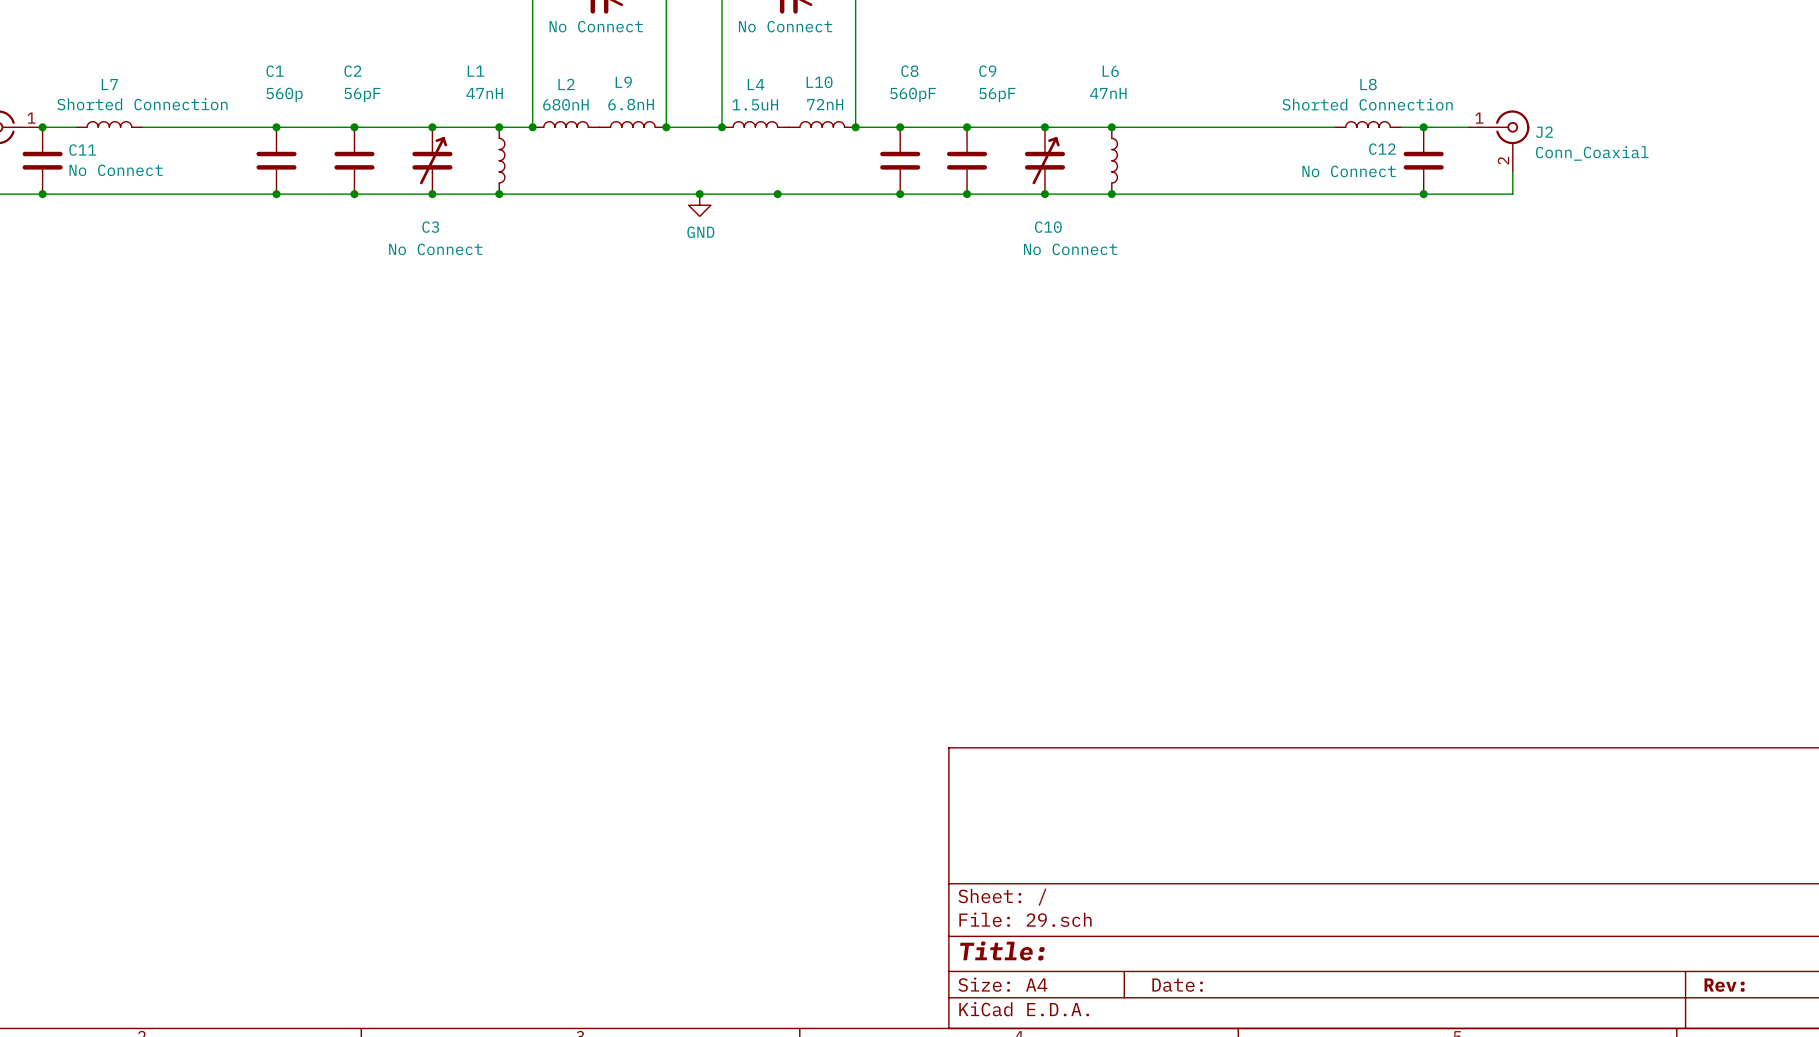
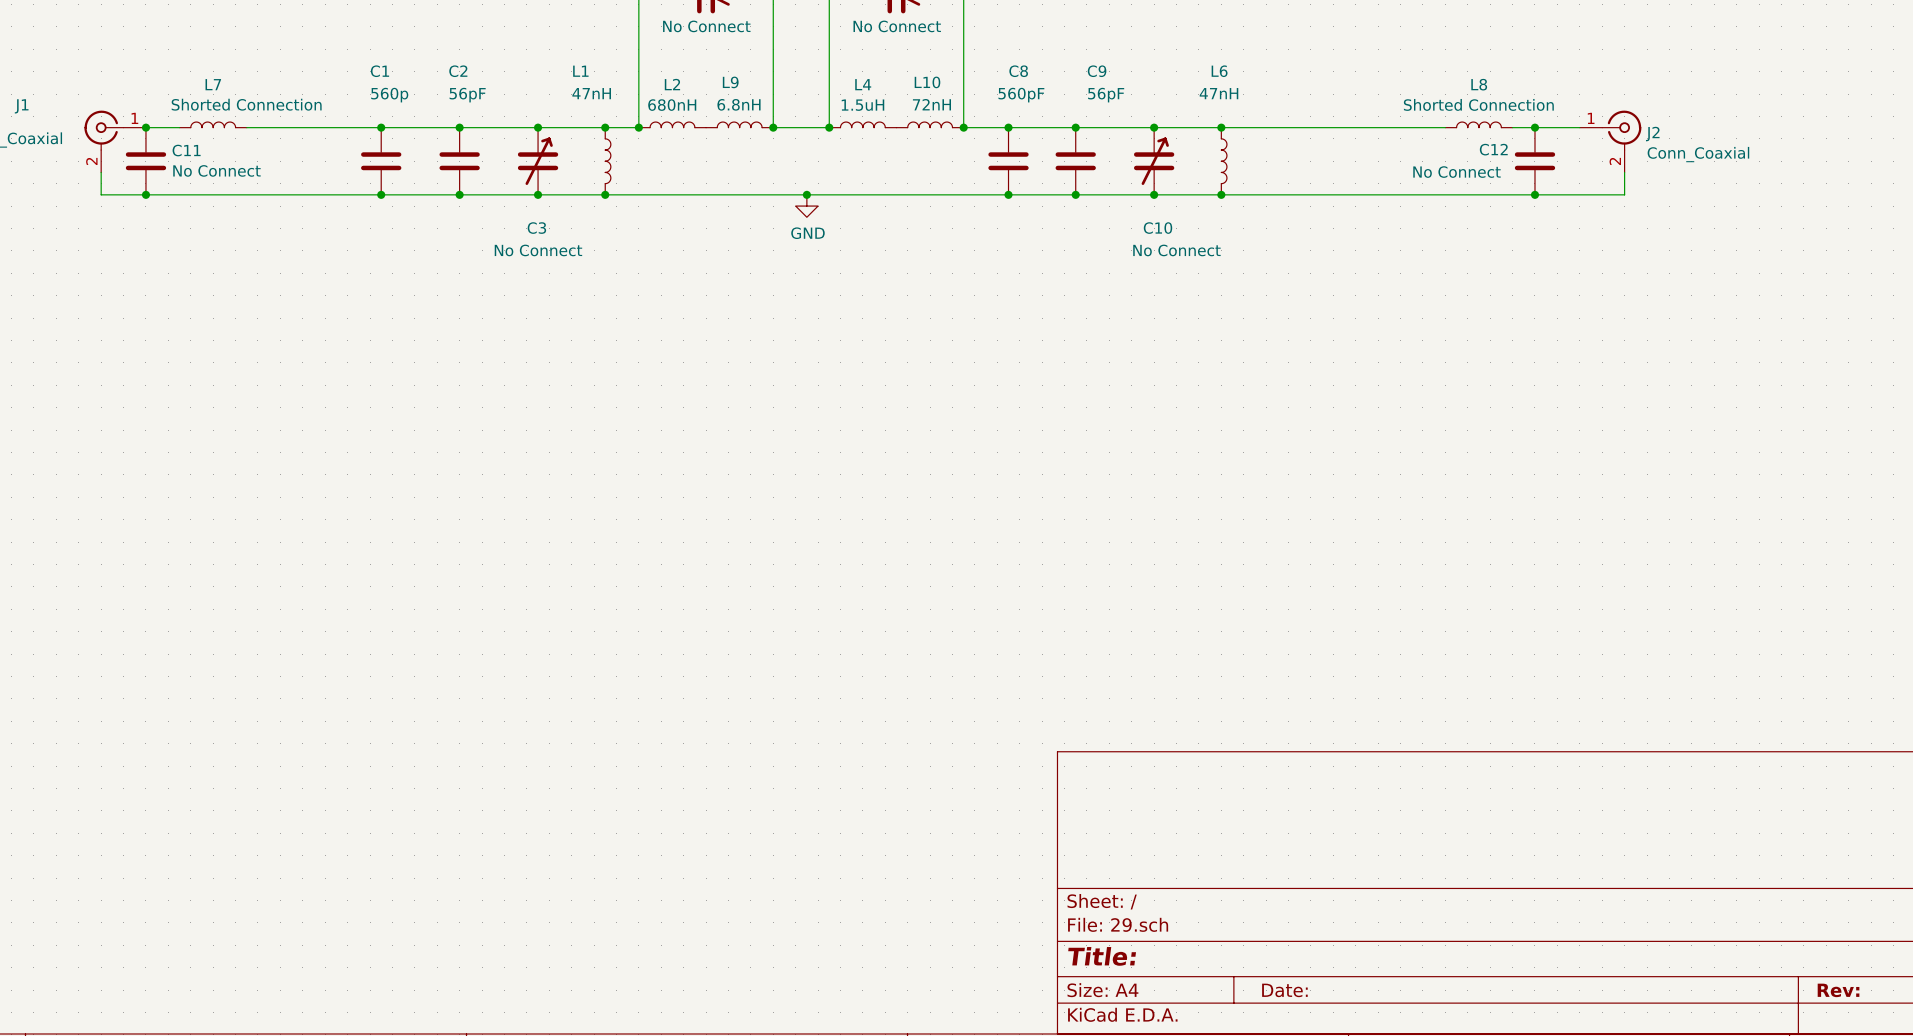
junction: (777, 194) -> none

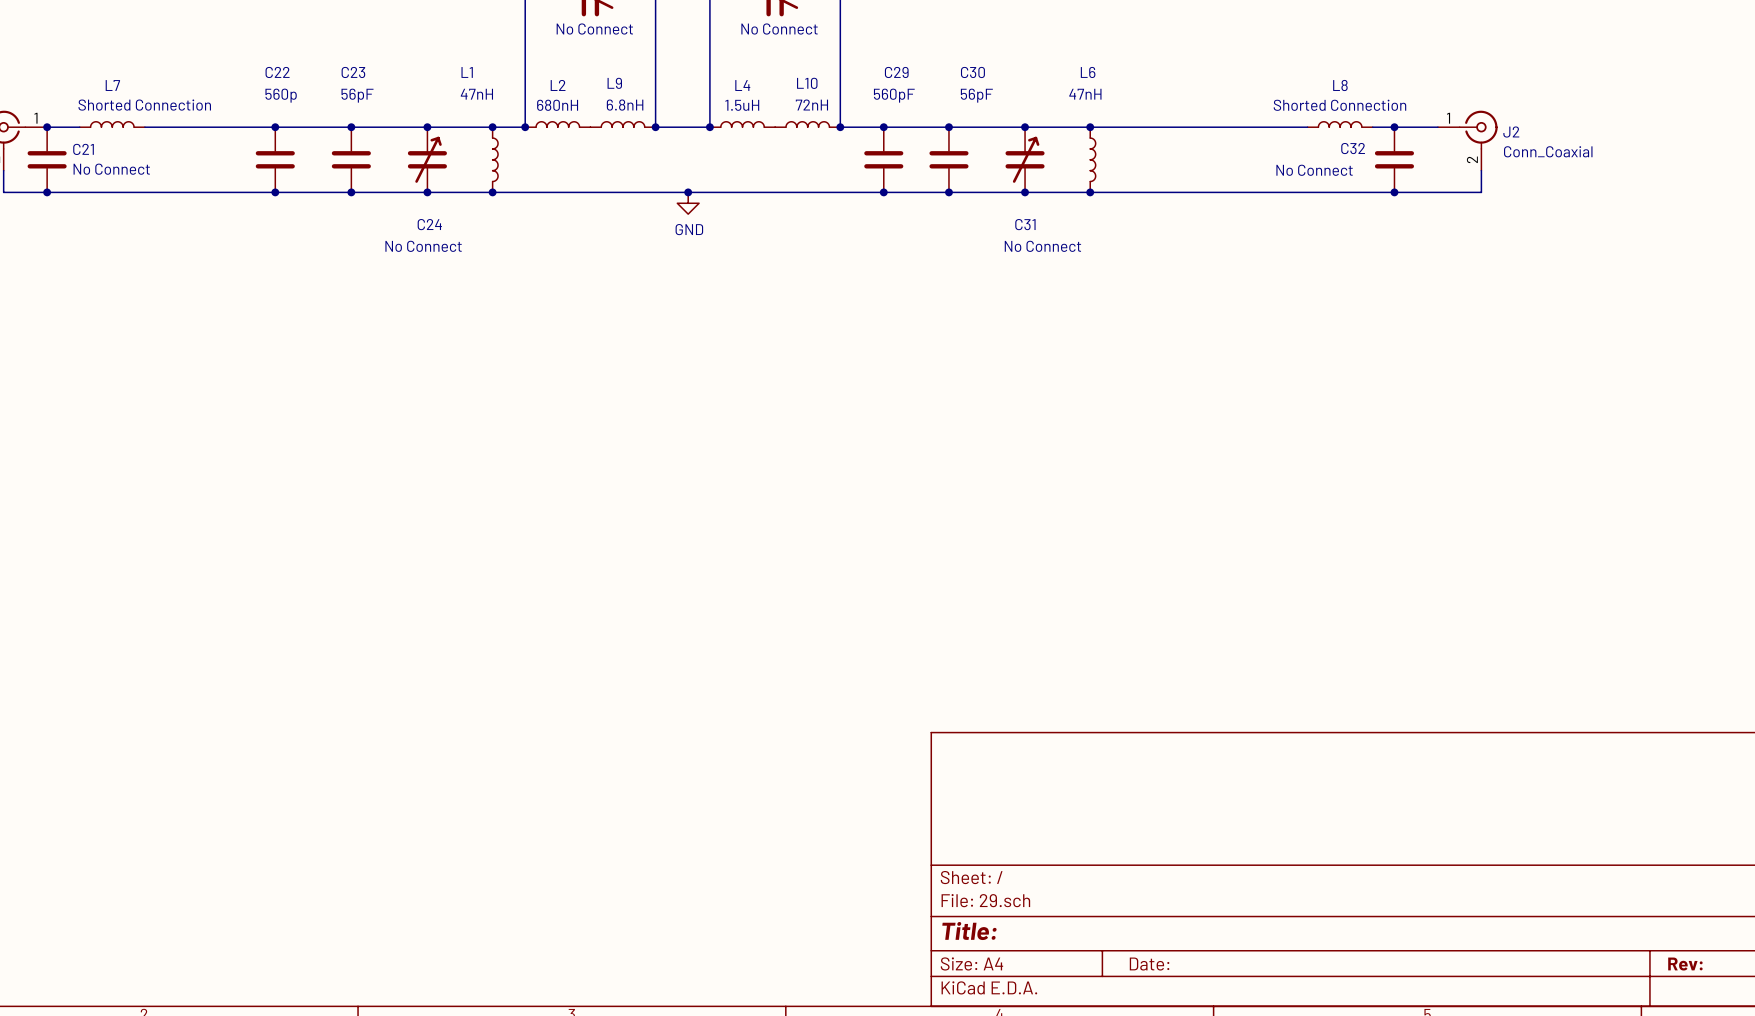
C1 name: C1 (379, 71) -> C22 (277, 72)
C2 name: C2 (458, 71) -> C23 (353, 72)
C8 name: C8 (1018, 71) -> C29 (896, 72)
C9 name: C9 (1097, 71) -> C30 (972, 72)
C12 name: C12 (1493, 149) -> C32 (1353, 148)
C11 name: C11 (186, 150) -> C21 (83, 149)
C3 name: C3 (536, 228) -> C24 (429, 224)
C10 name: C10 (1157, 228) -> C31 (1025, 224)

